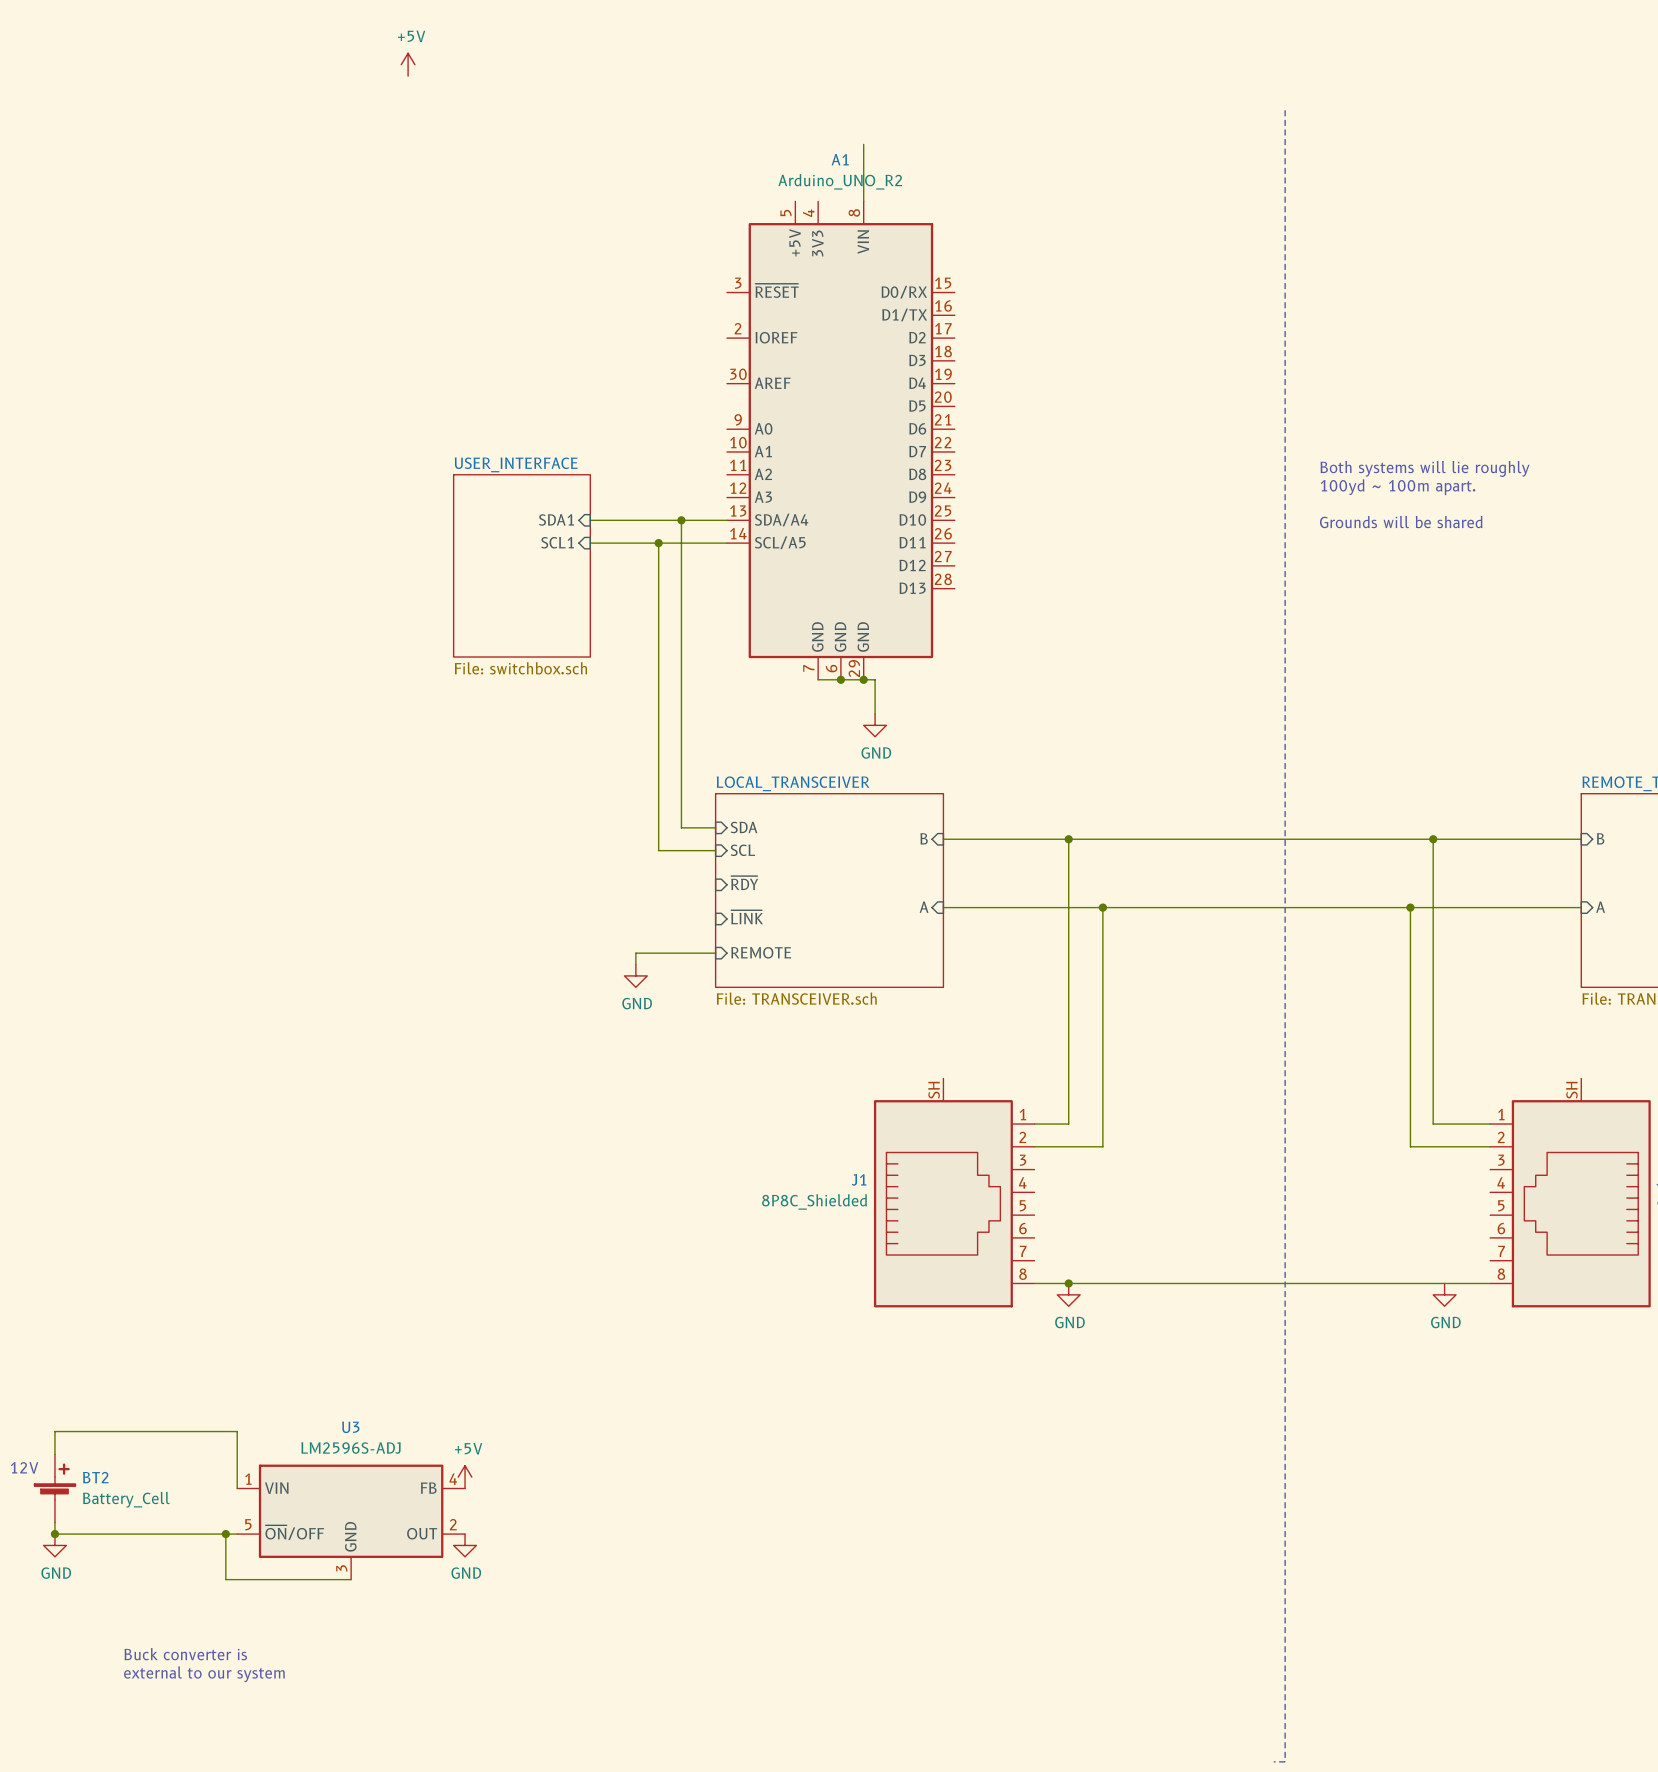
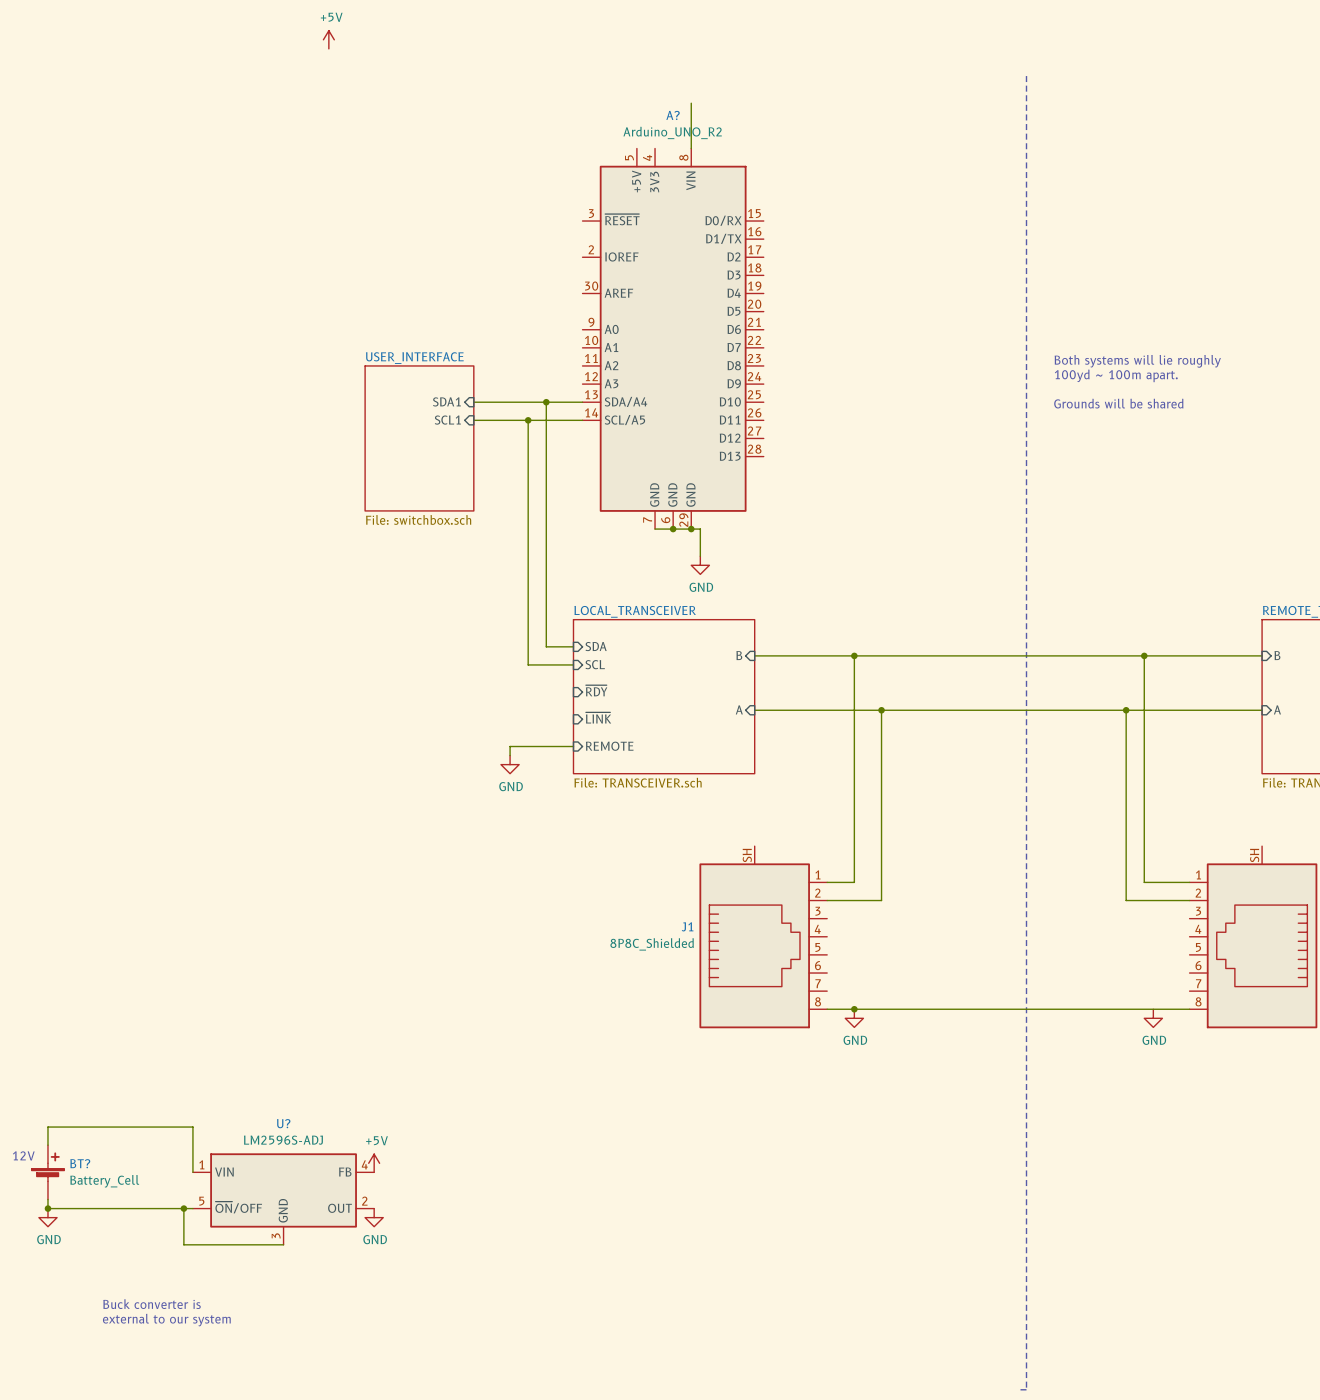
A1 name: A1 (840, 159) -> A? (673, 115)
U3 name: U3 (350, 1427) -> U? (283, 1123)
BT2 name: BT2 (95, 1477) -> BT? (80, 1163)

